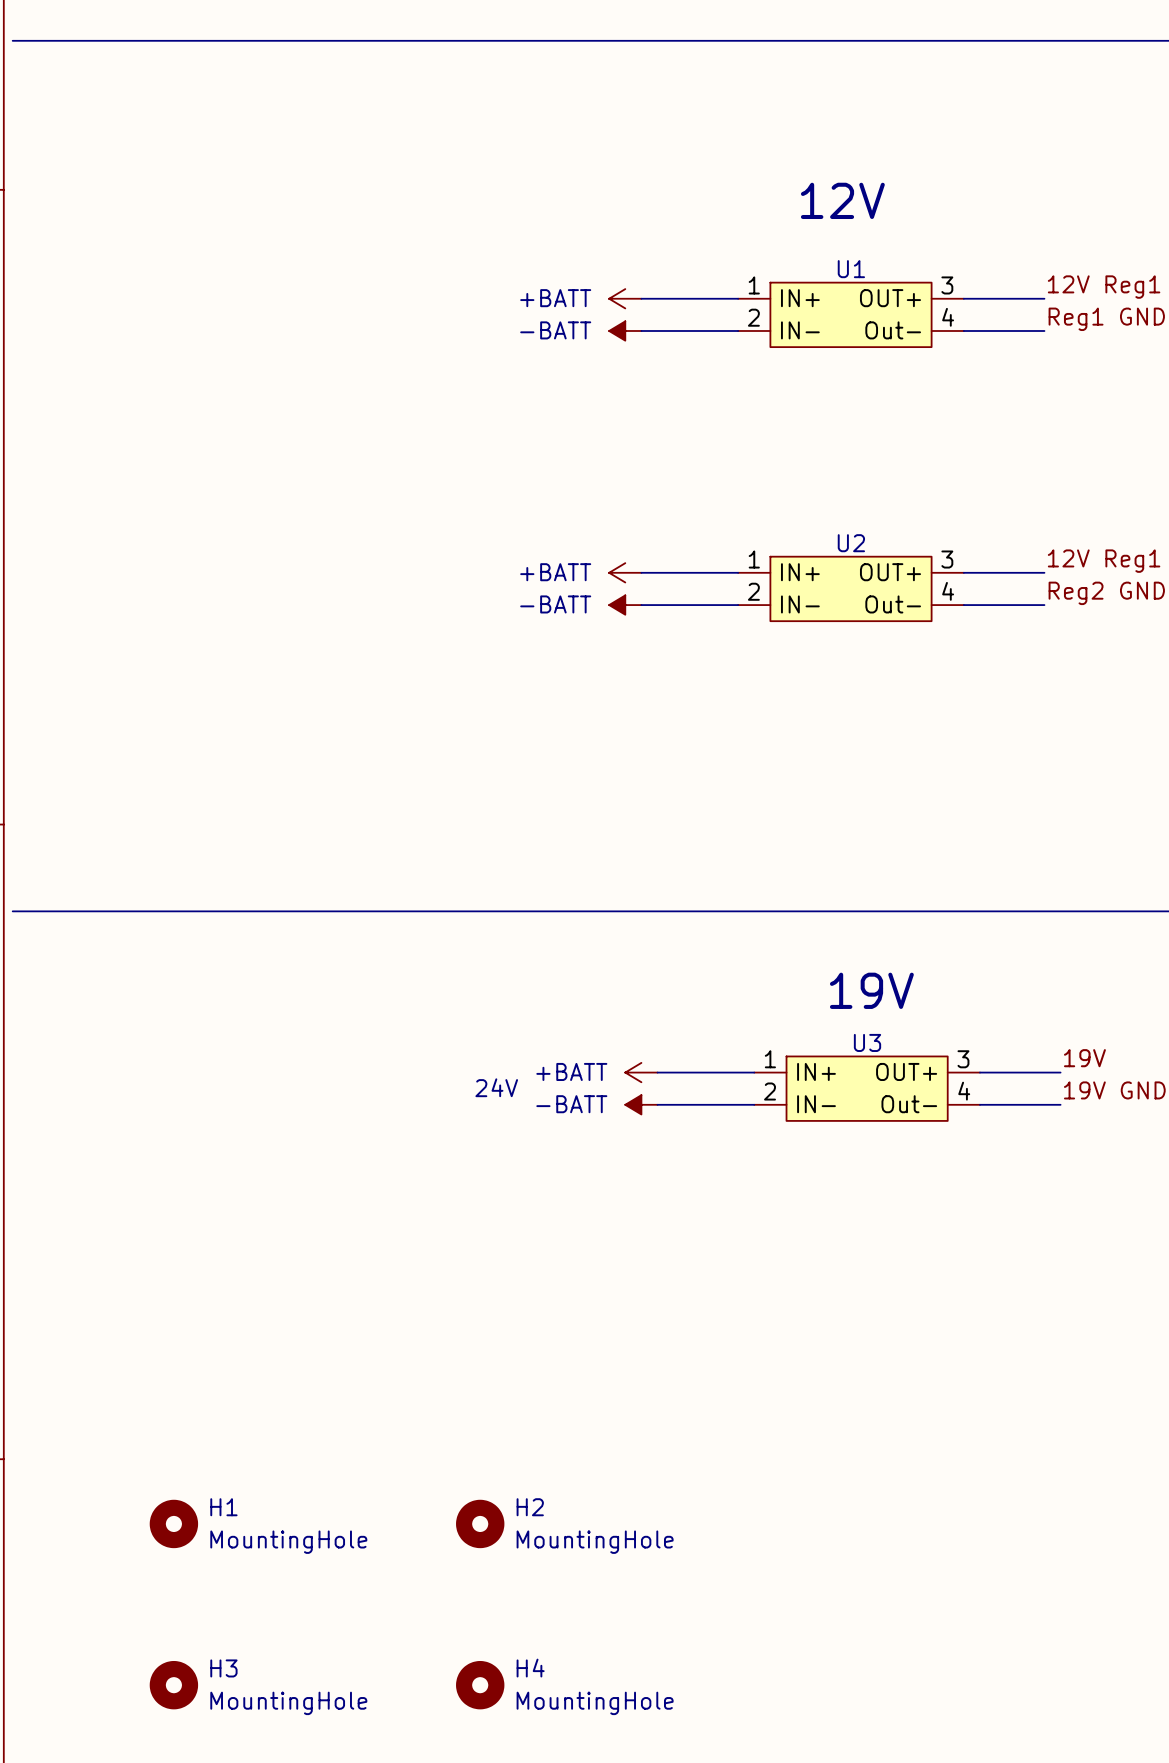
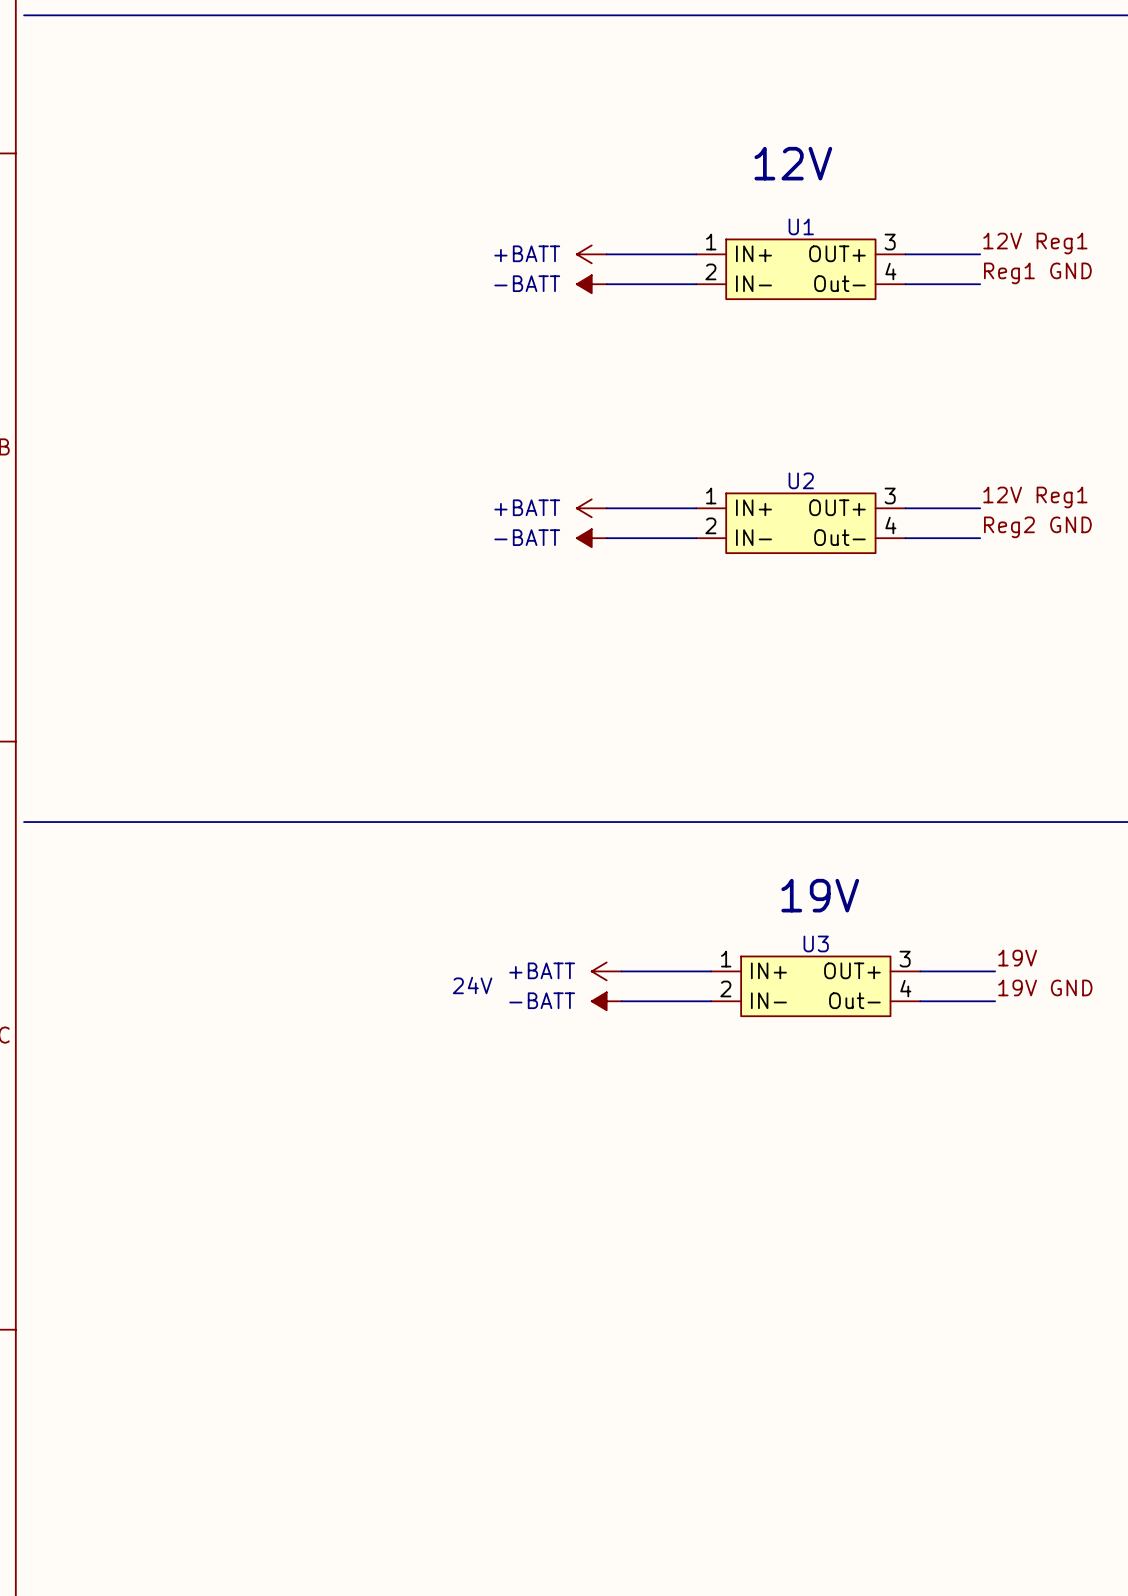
H1: MountingHole (173, 1523) -> none
H2: MountingHole (480, 1523) -> none
H3: MountingHole (173, 1685) -> none
H4: MountingHole (480, 1685) -> none

